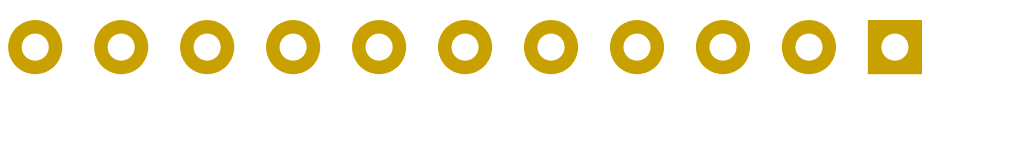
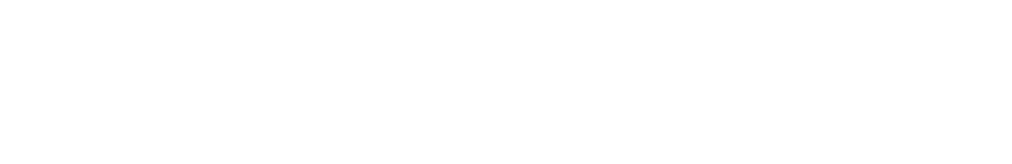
part: (465, 47) -> none

